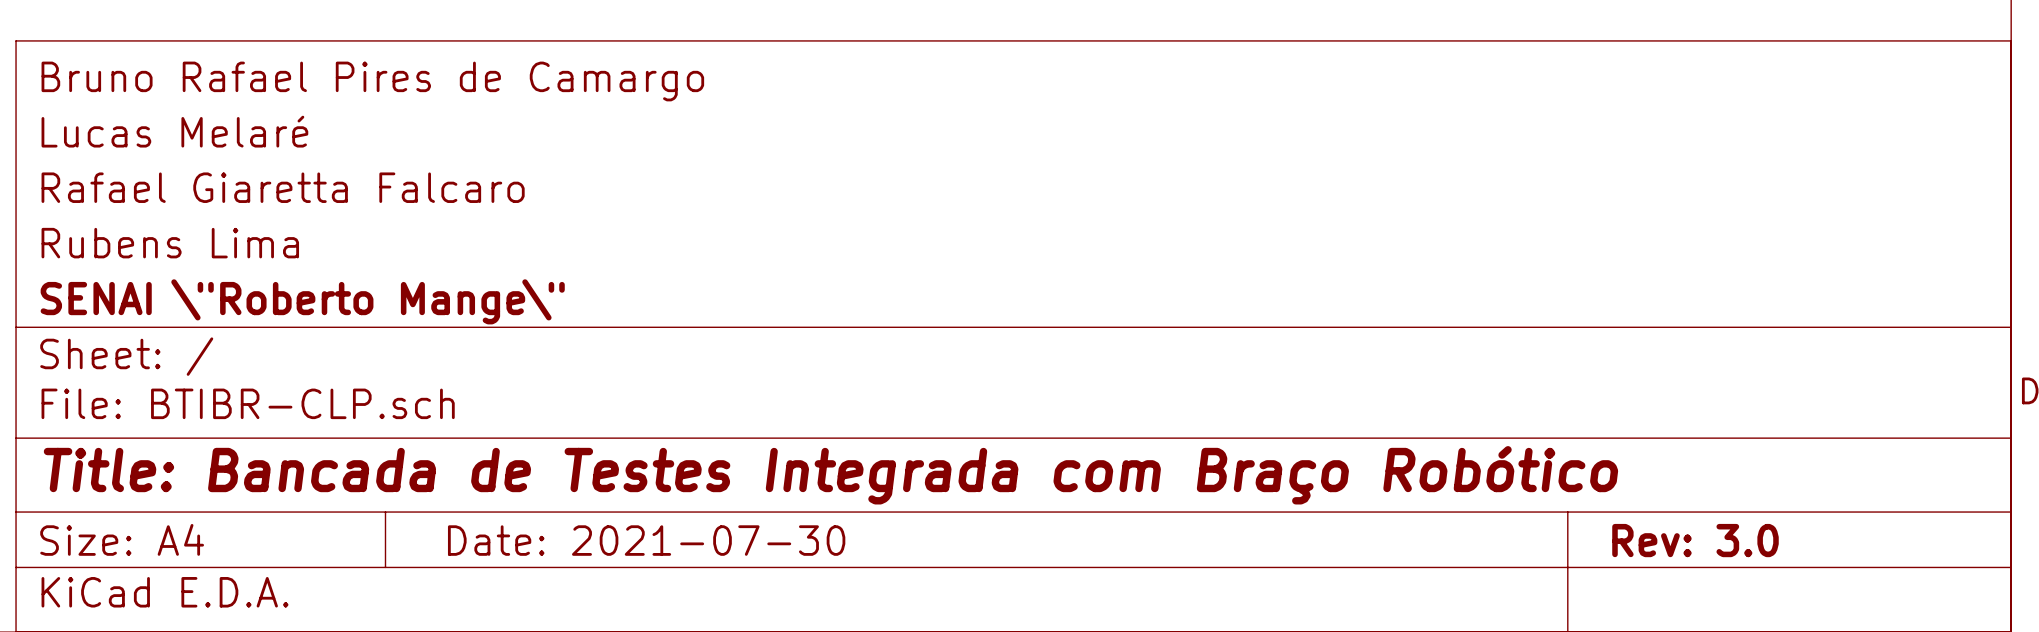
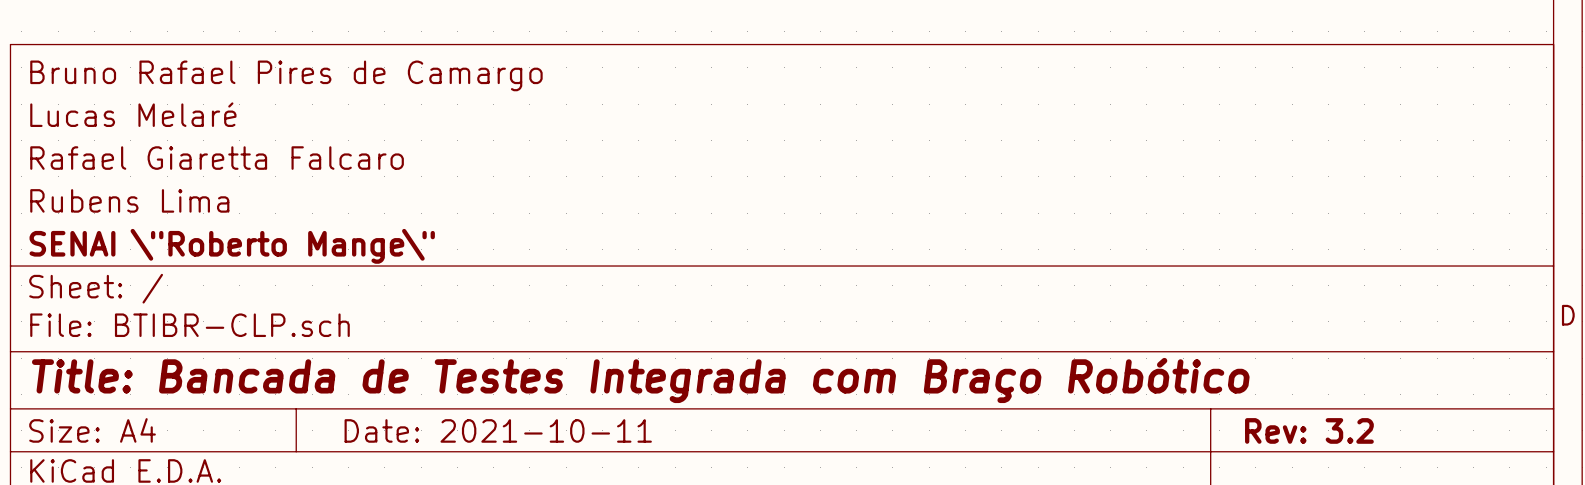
title block: Date: 2021-07-30 (646, 540) -> Date: 2021-10-11 (498, 430)
title block: Rev: 3.0 (1695, 540) -> Rev: 3.2 (1309, 430)

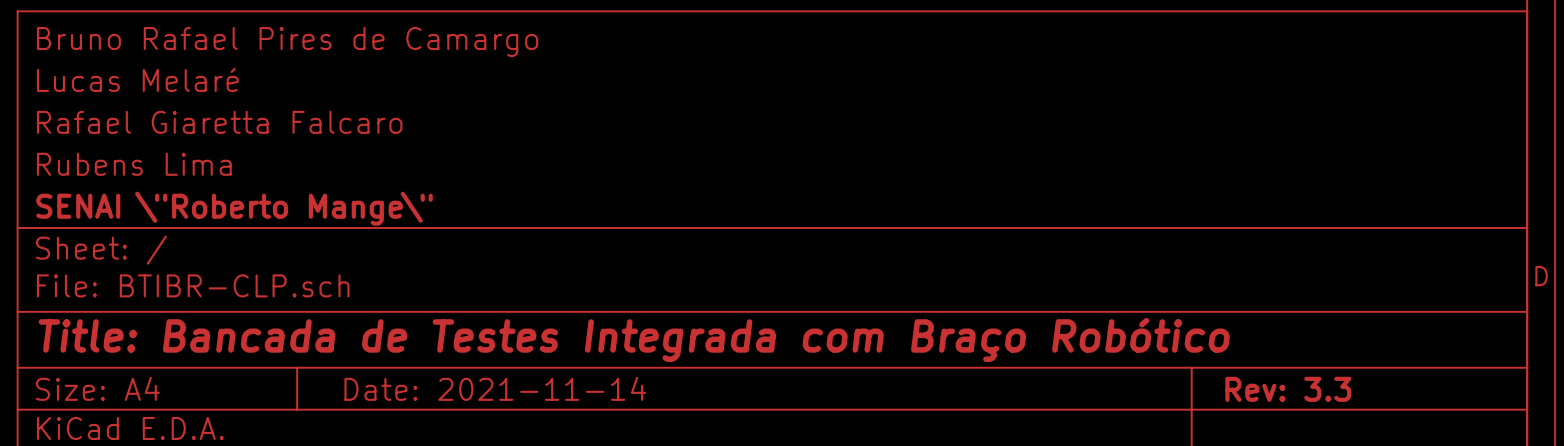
title block: Date: 2021-10-11 (498, 430) -> Date: 2021-11-14 (495, 388)
title block: Rev: 3.2 (1309, 430) -> Rev: 3.3 (1288, 389)

